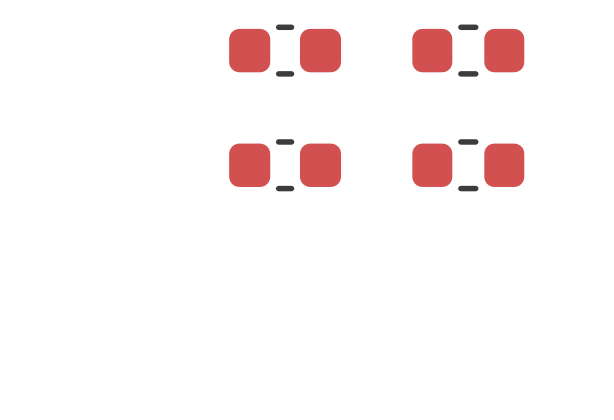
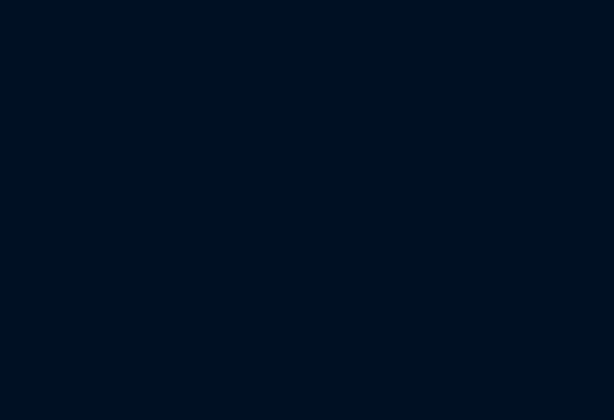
part: (285, 50) -> none
part: (468, 50) -> none
part: (285, 165) -> none
part: (468, 165) -> none

